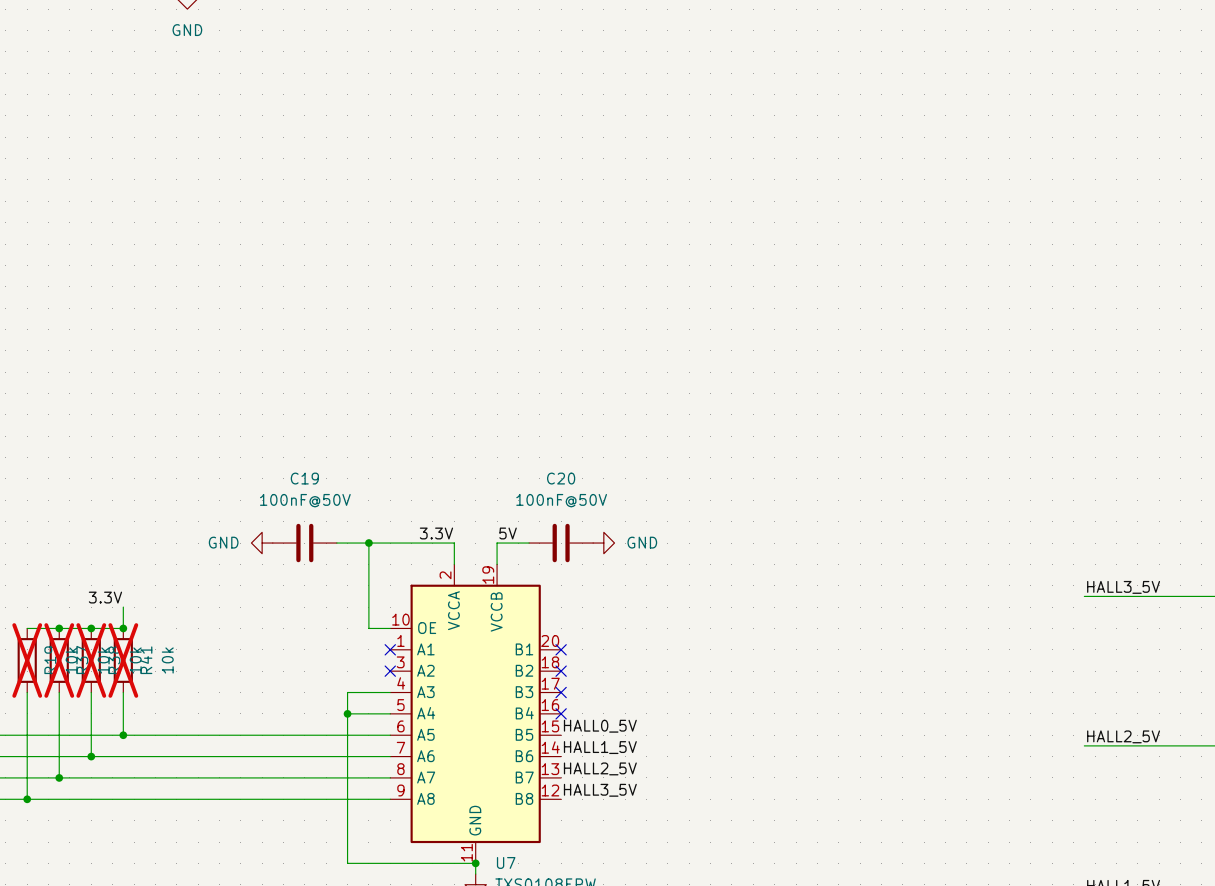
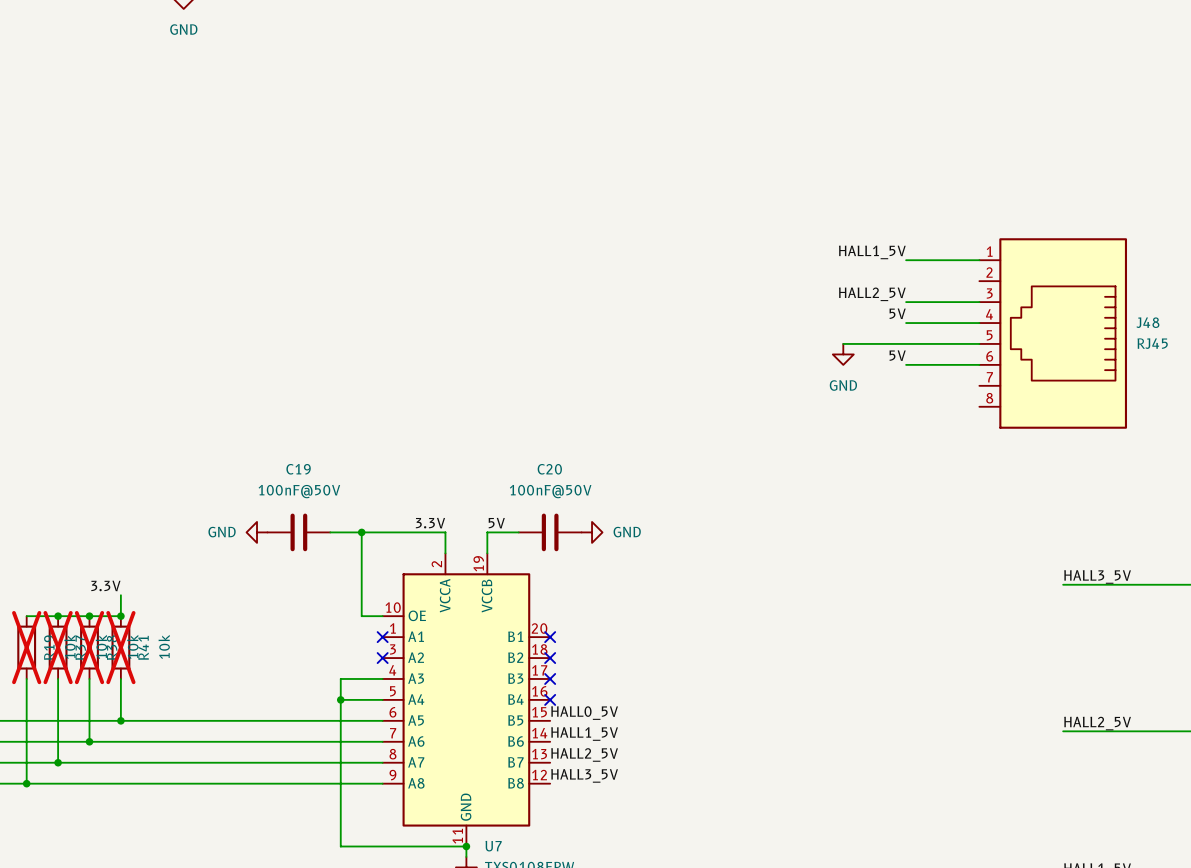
label: none -> HALL1_5V (872, 252)
wire: none -> (906, 260) (979, 260)
label: none -> HALL2_5V (872, 294)
wire: none -> (906, 302) (979, 302)
label: none -> 5V (897, 313)
wire: none -> (906, 323) (979, 323)
J48: none -> RJ45 (1053, 333)
wire: none -> (843, 343) (979, 343)
power symbol: none -> GND (843, 354)
label: none -> 5V (897, 355)
wire: none -> (906, 364) (979, 364)

